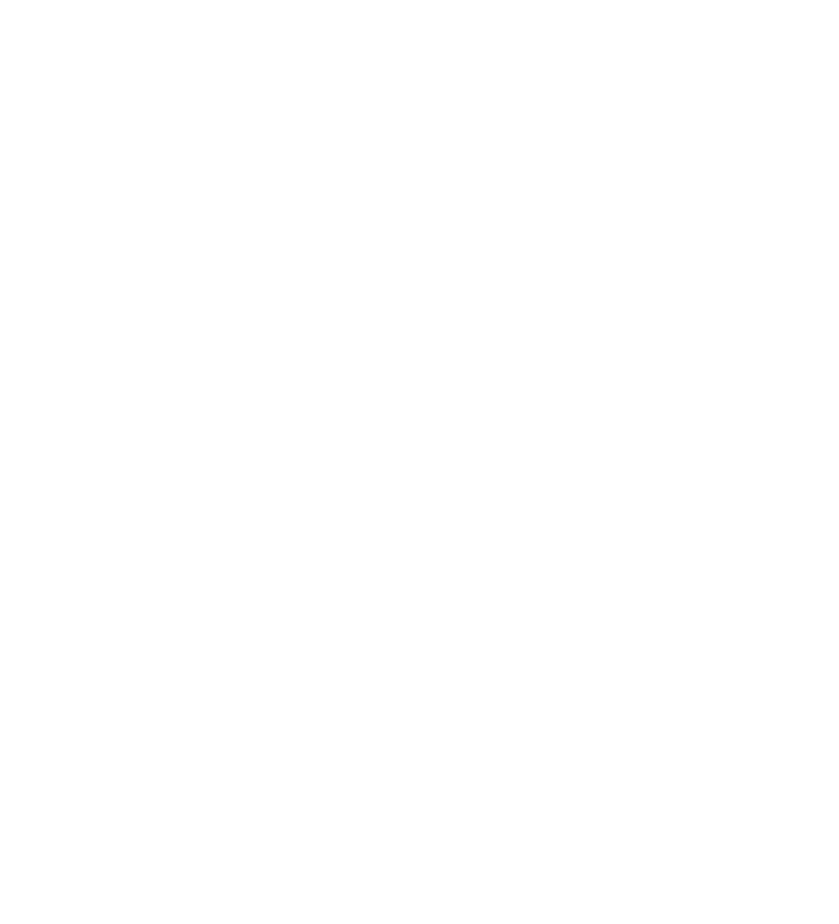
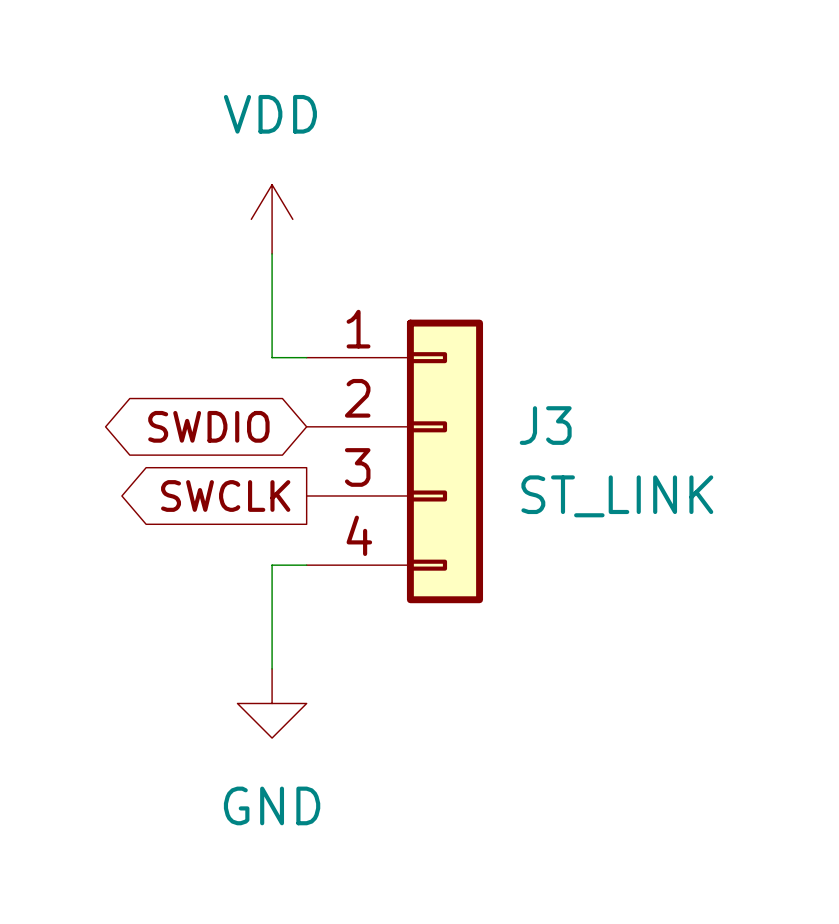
power symbol: none -> VDD (272, 219)
wire: none -> (272, 253) (272, 357) (306, 357)
global label: none -> SWDIO (208, 426)
J3: none -> ST_LINK (394, 461)
global label: none -> SWCLK (225, 495)
wire: none -> (306, 565) (272, 565) (272, 668)
power symbol: none -> GND (272, 703)

